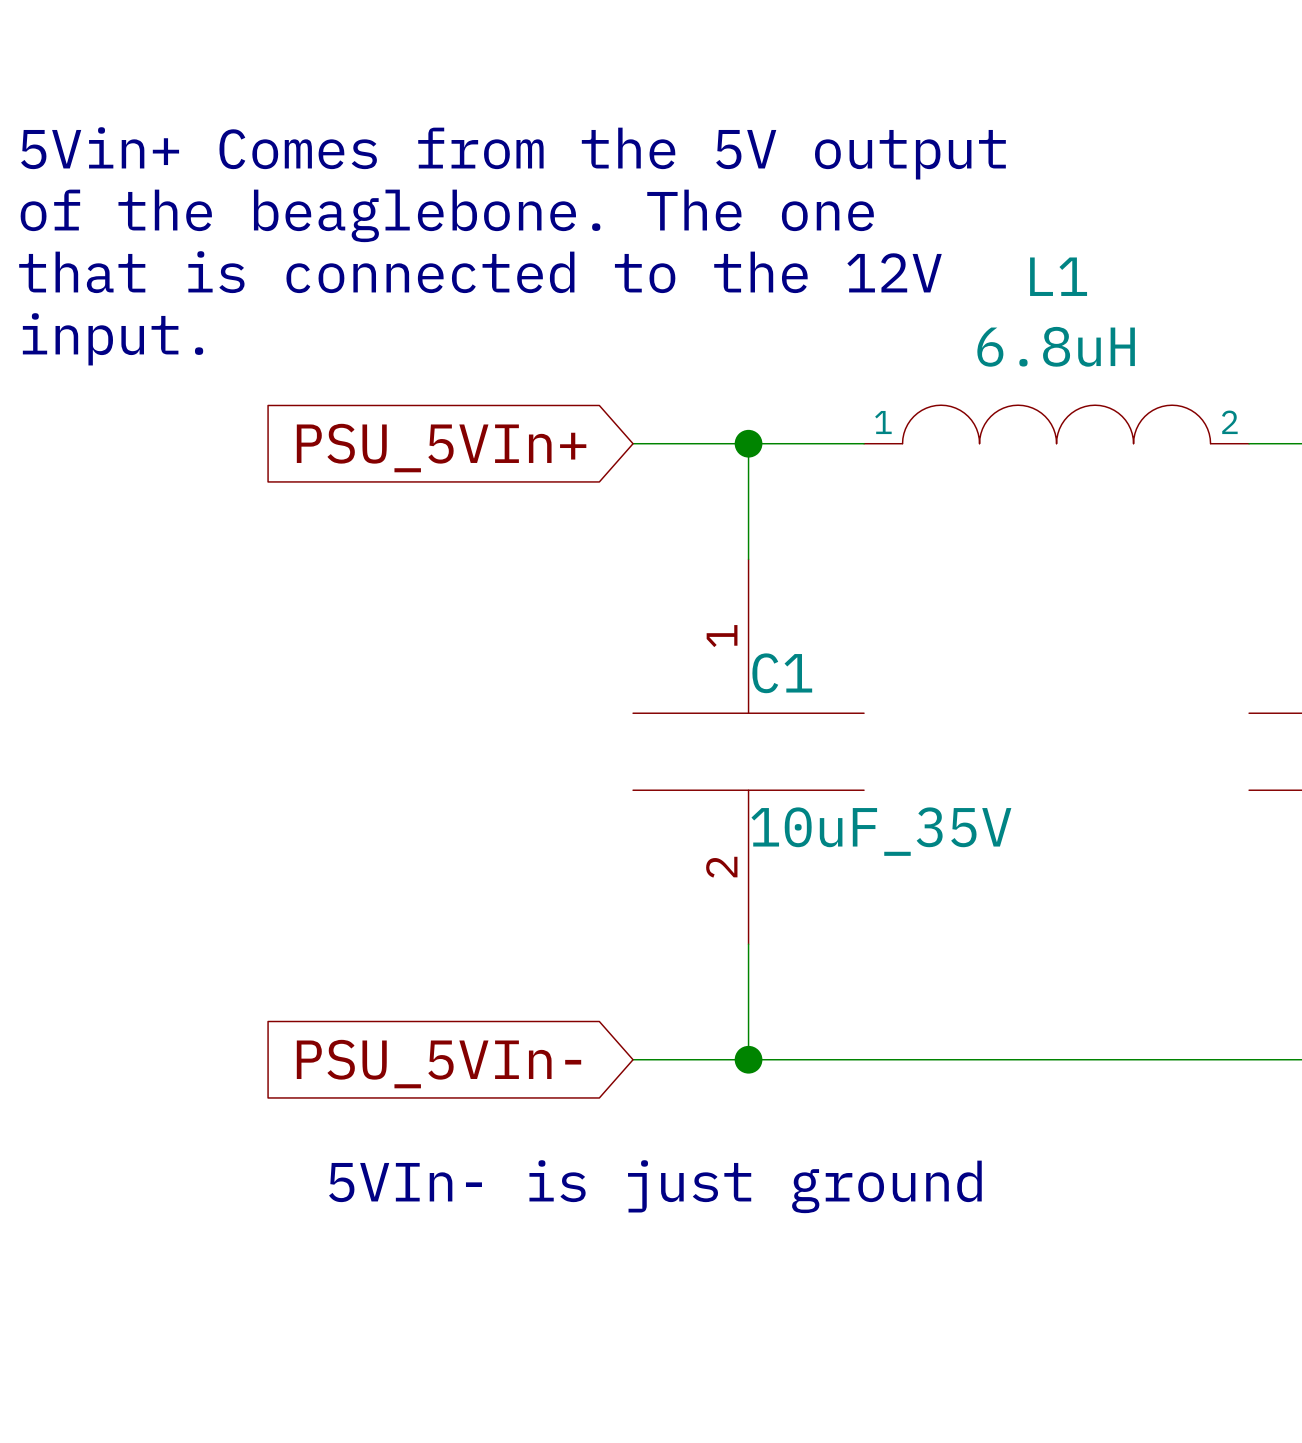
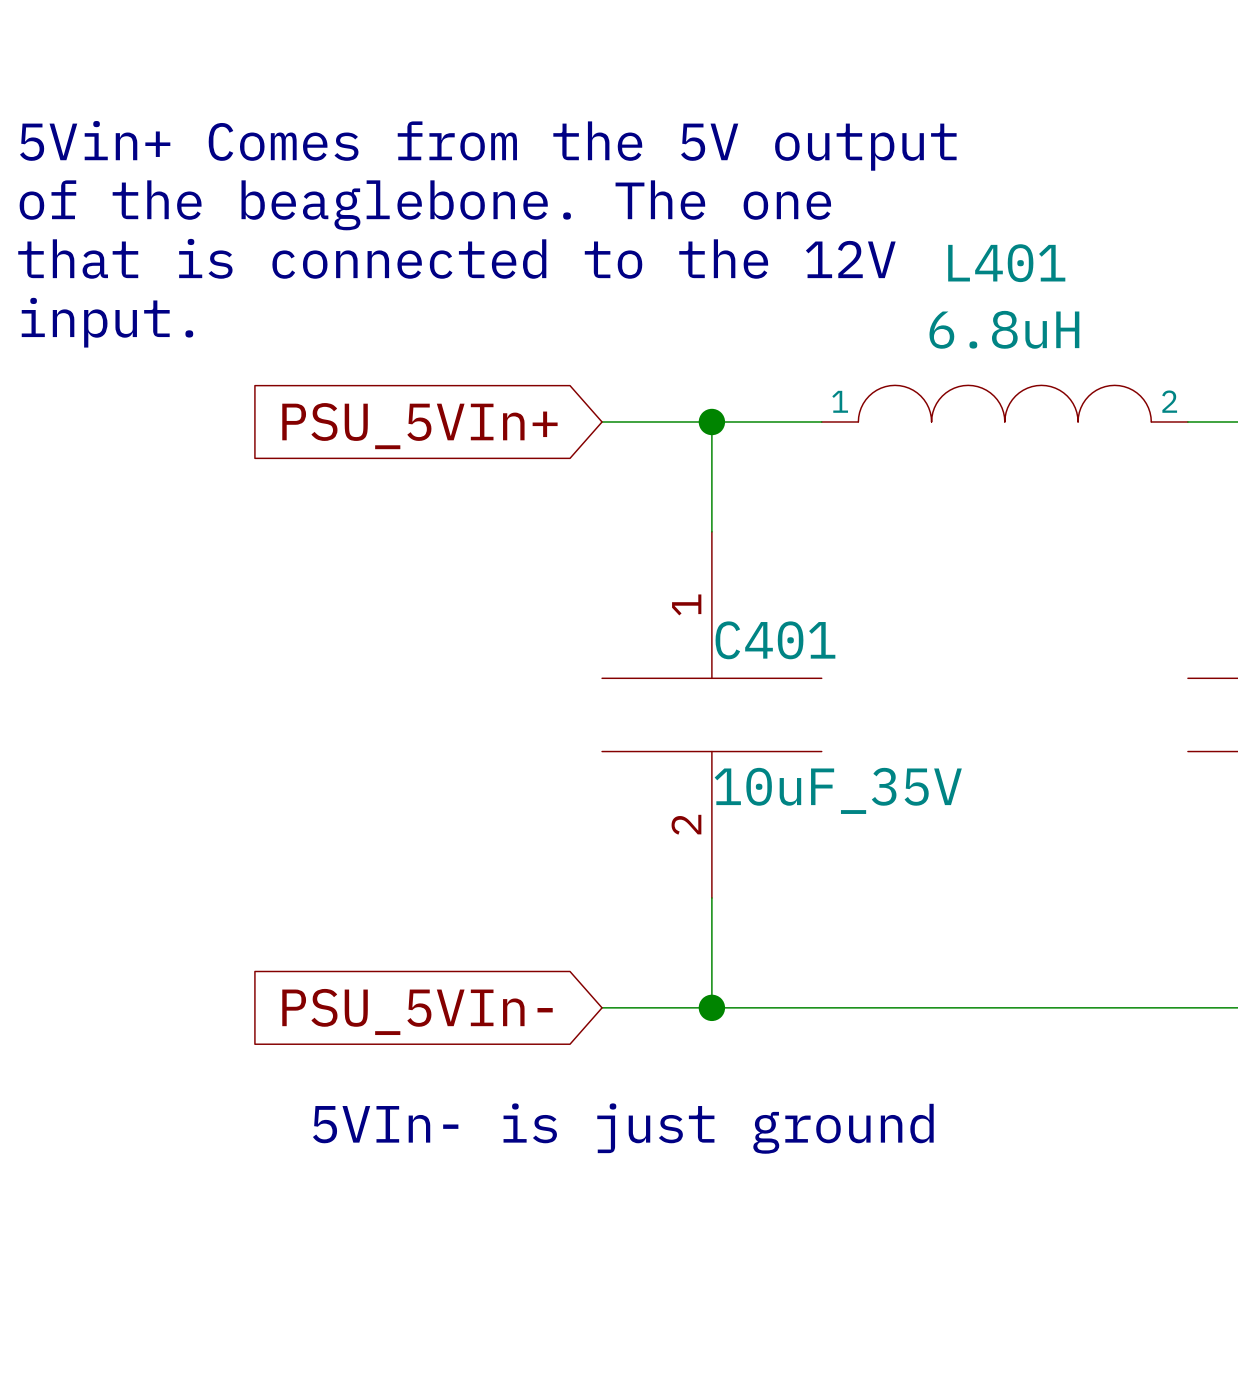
L1 name: L1 (1058, 276) -> L401 (1006, 263)
C1 name: C1 (782, 673) -> C401 (775, 640)

